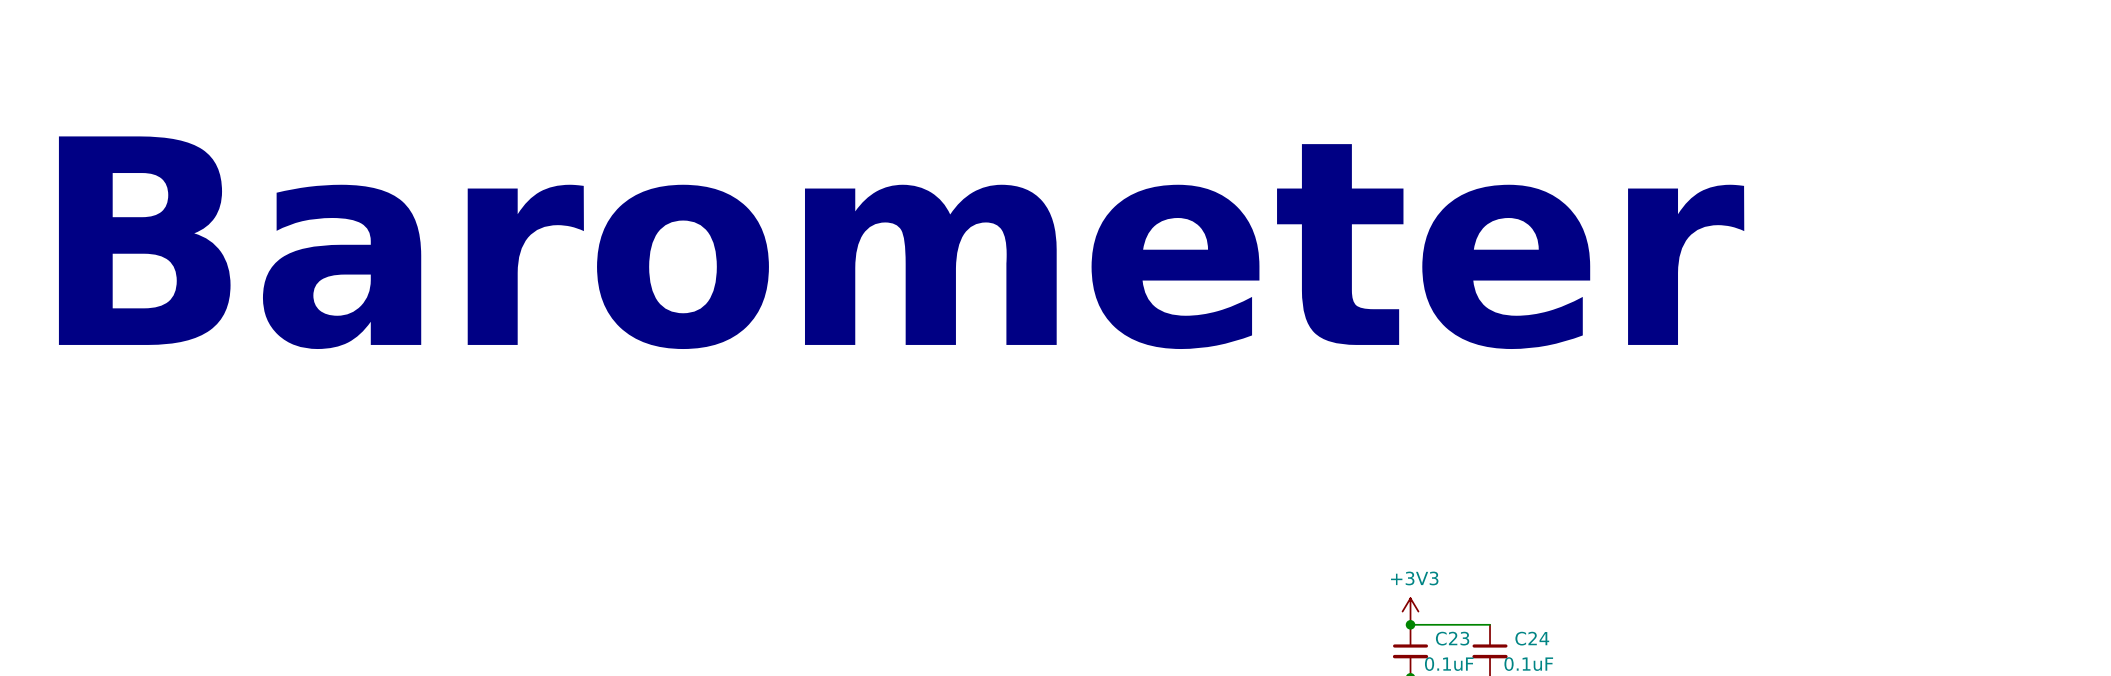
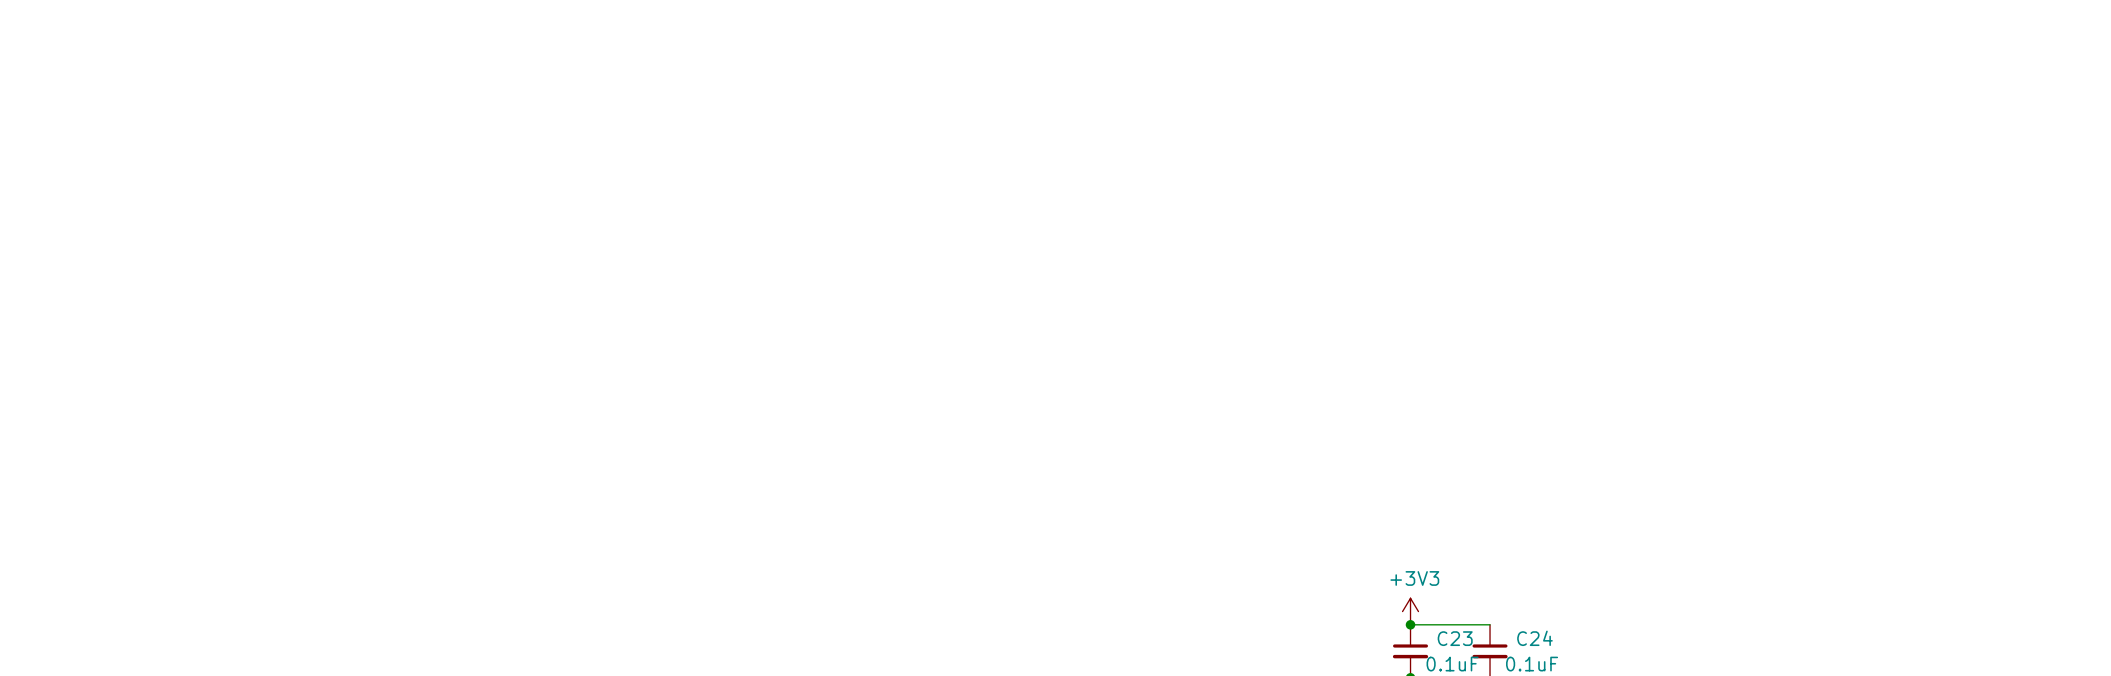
text: Barometer (901, 242) -> none

